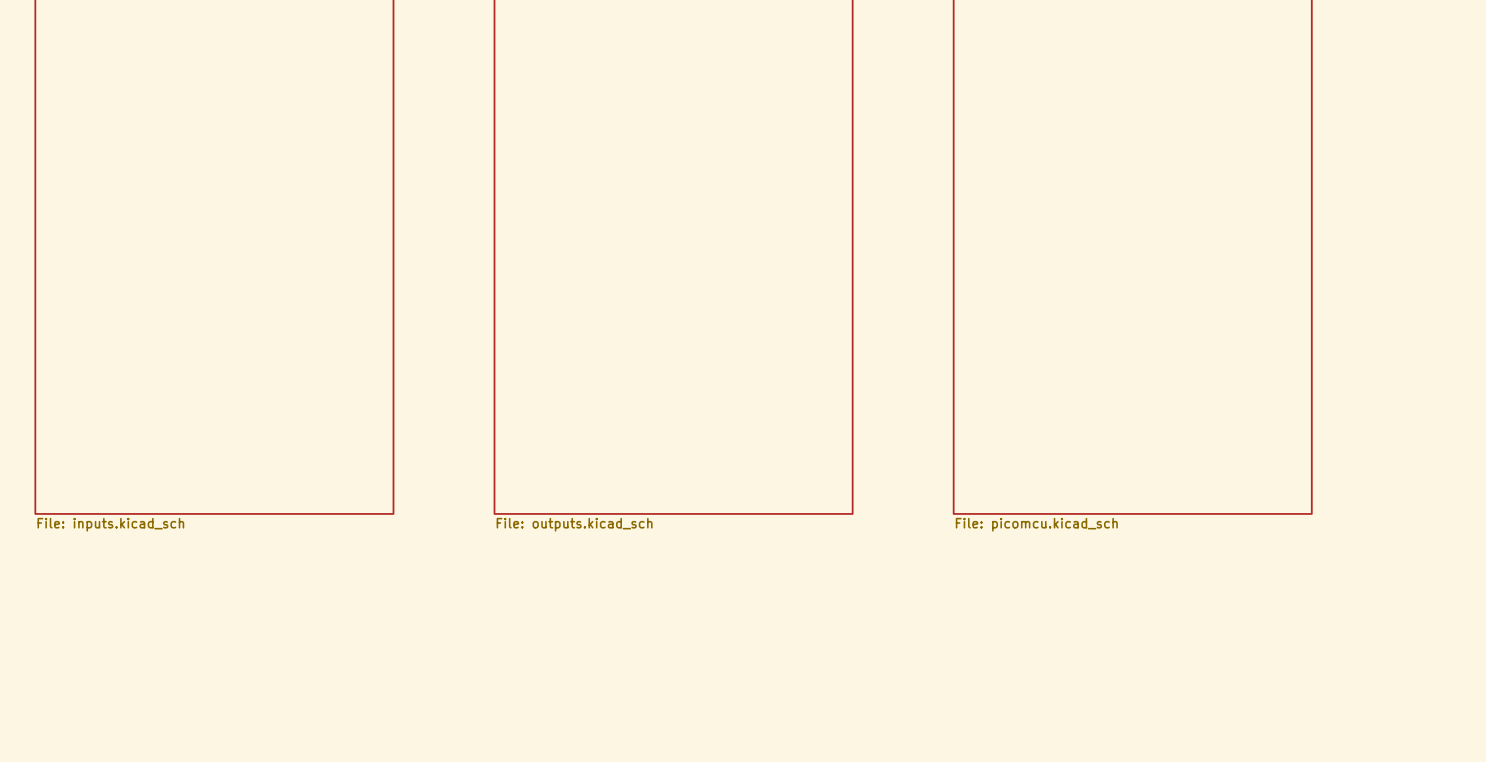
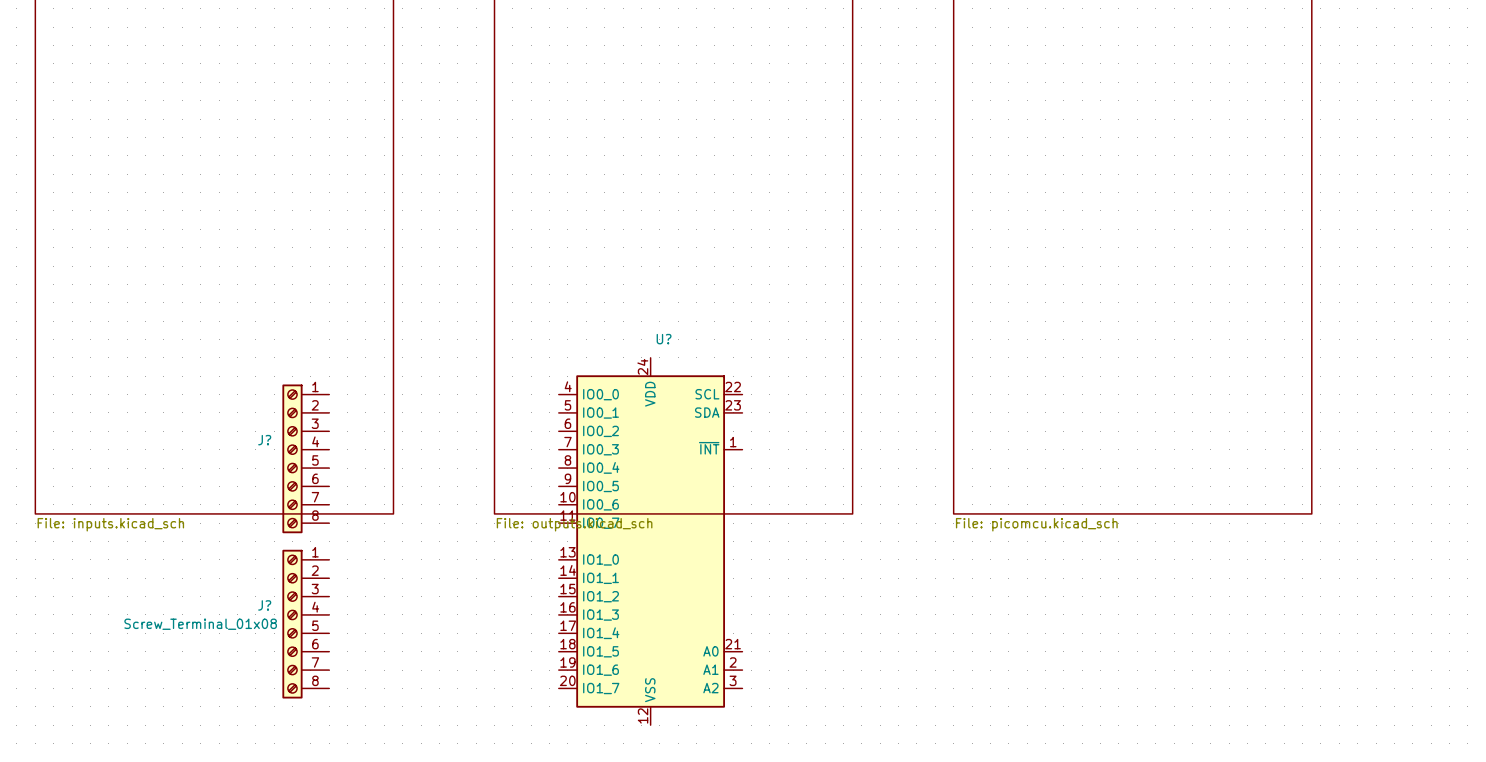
J?: none -> (305, 458)
U?: none -> (650, 541)
J?: none -> Screw_Terminal_01x08 (305, 624)

